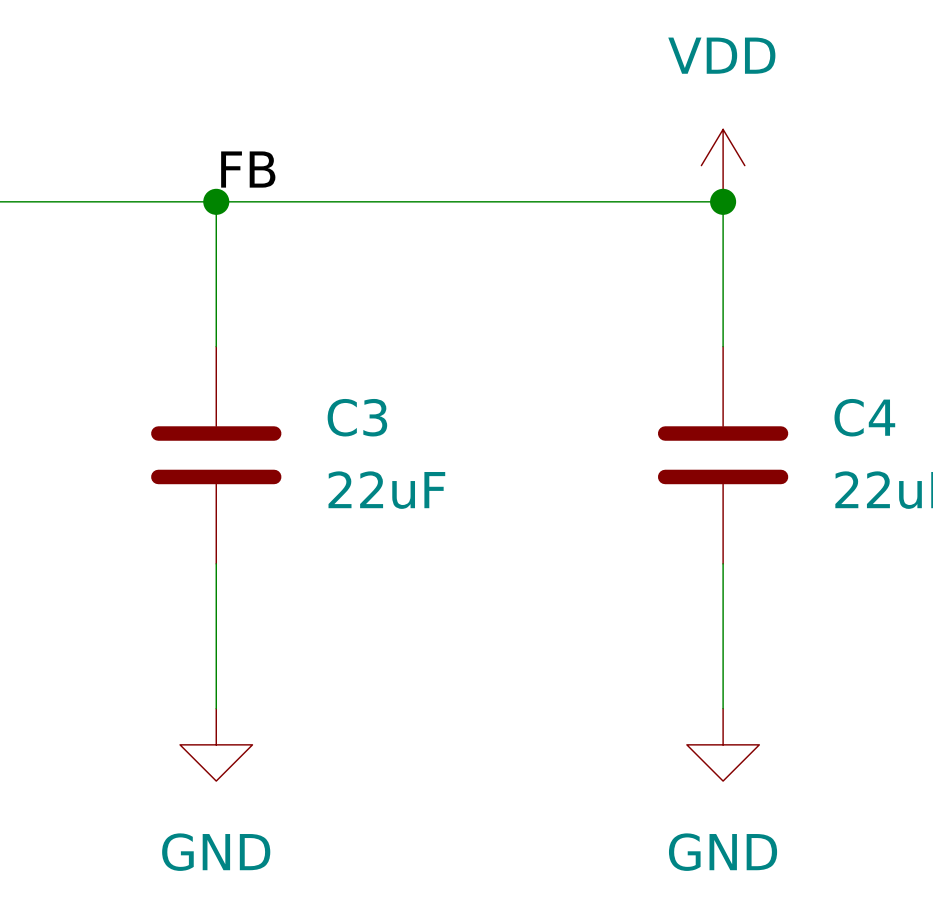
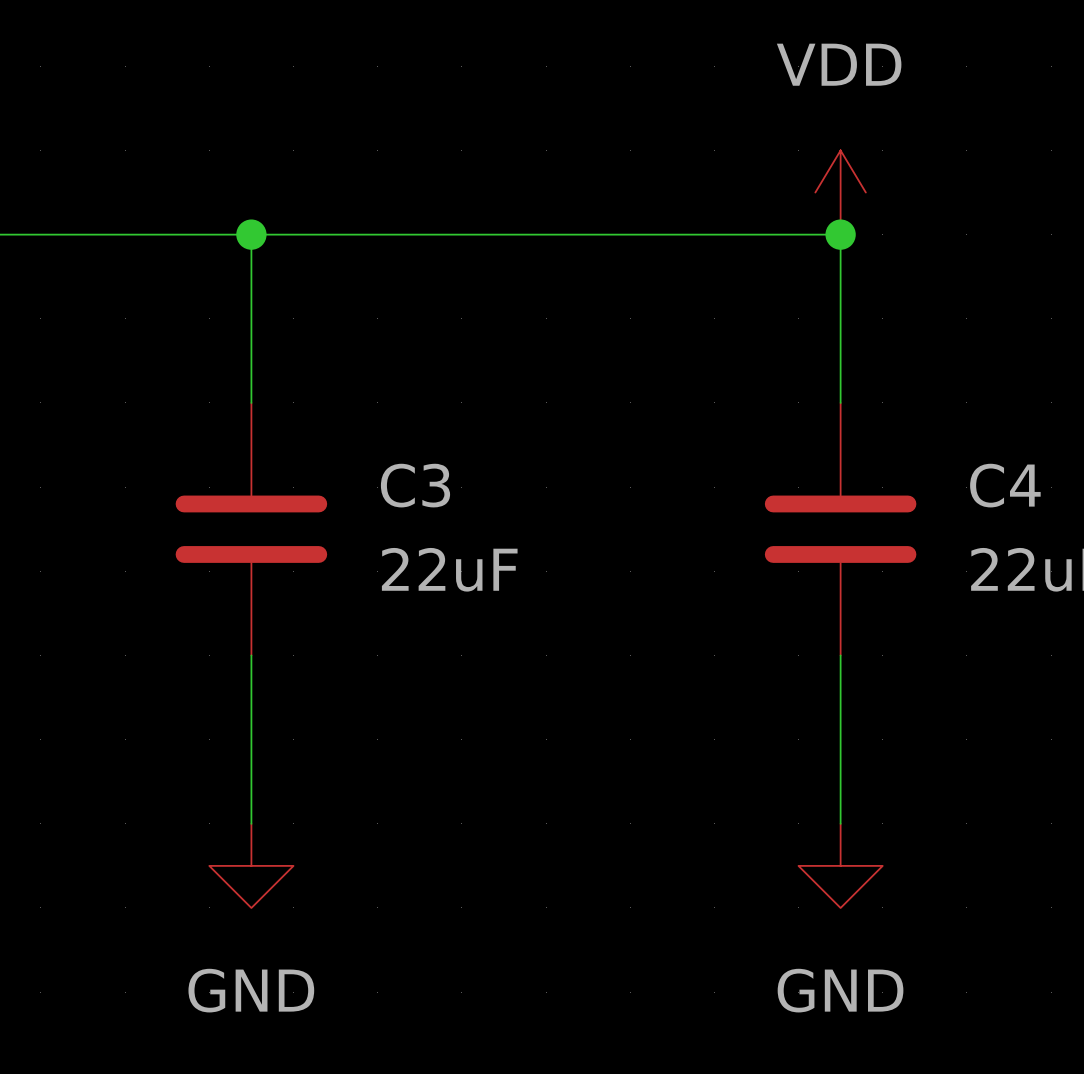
label: FB (248, 169) -> none

